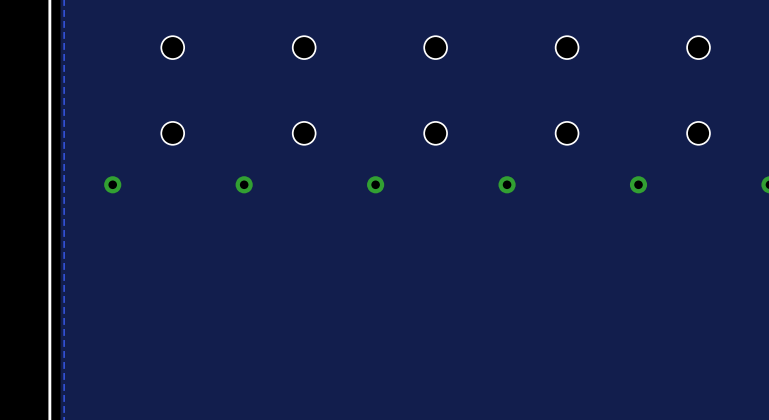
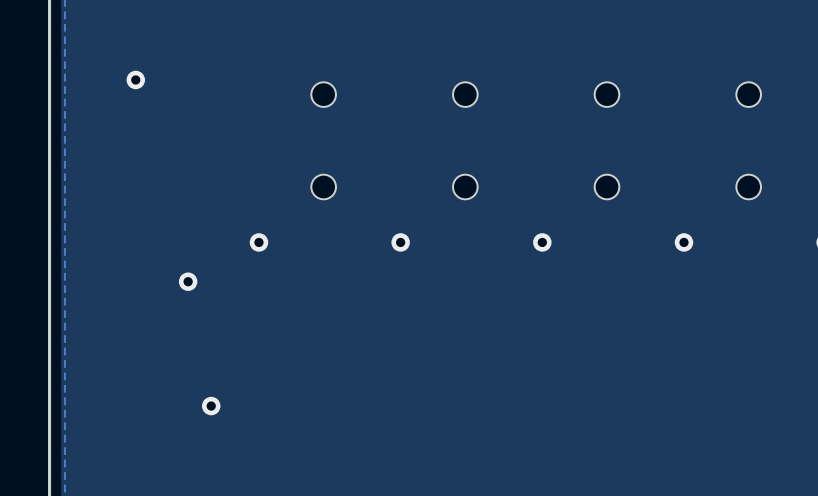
via: none -> (135, 79)
part: (172, 90) -> none
via position: (112, 184) -> (188, 281)
via: none -> (211, 406)

